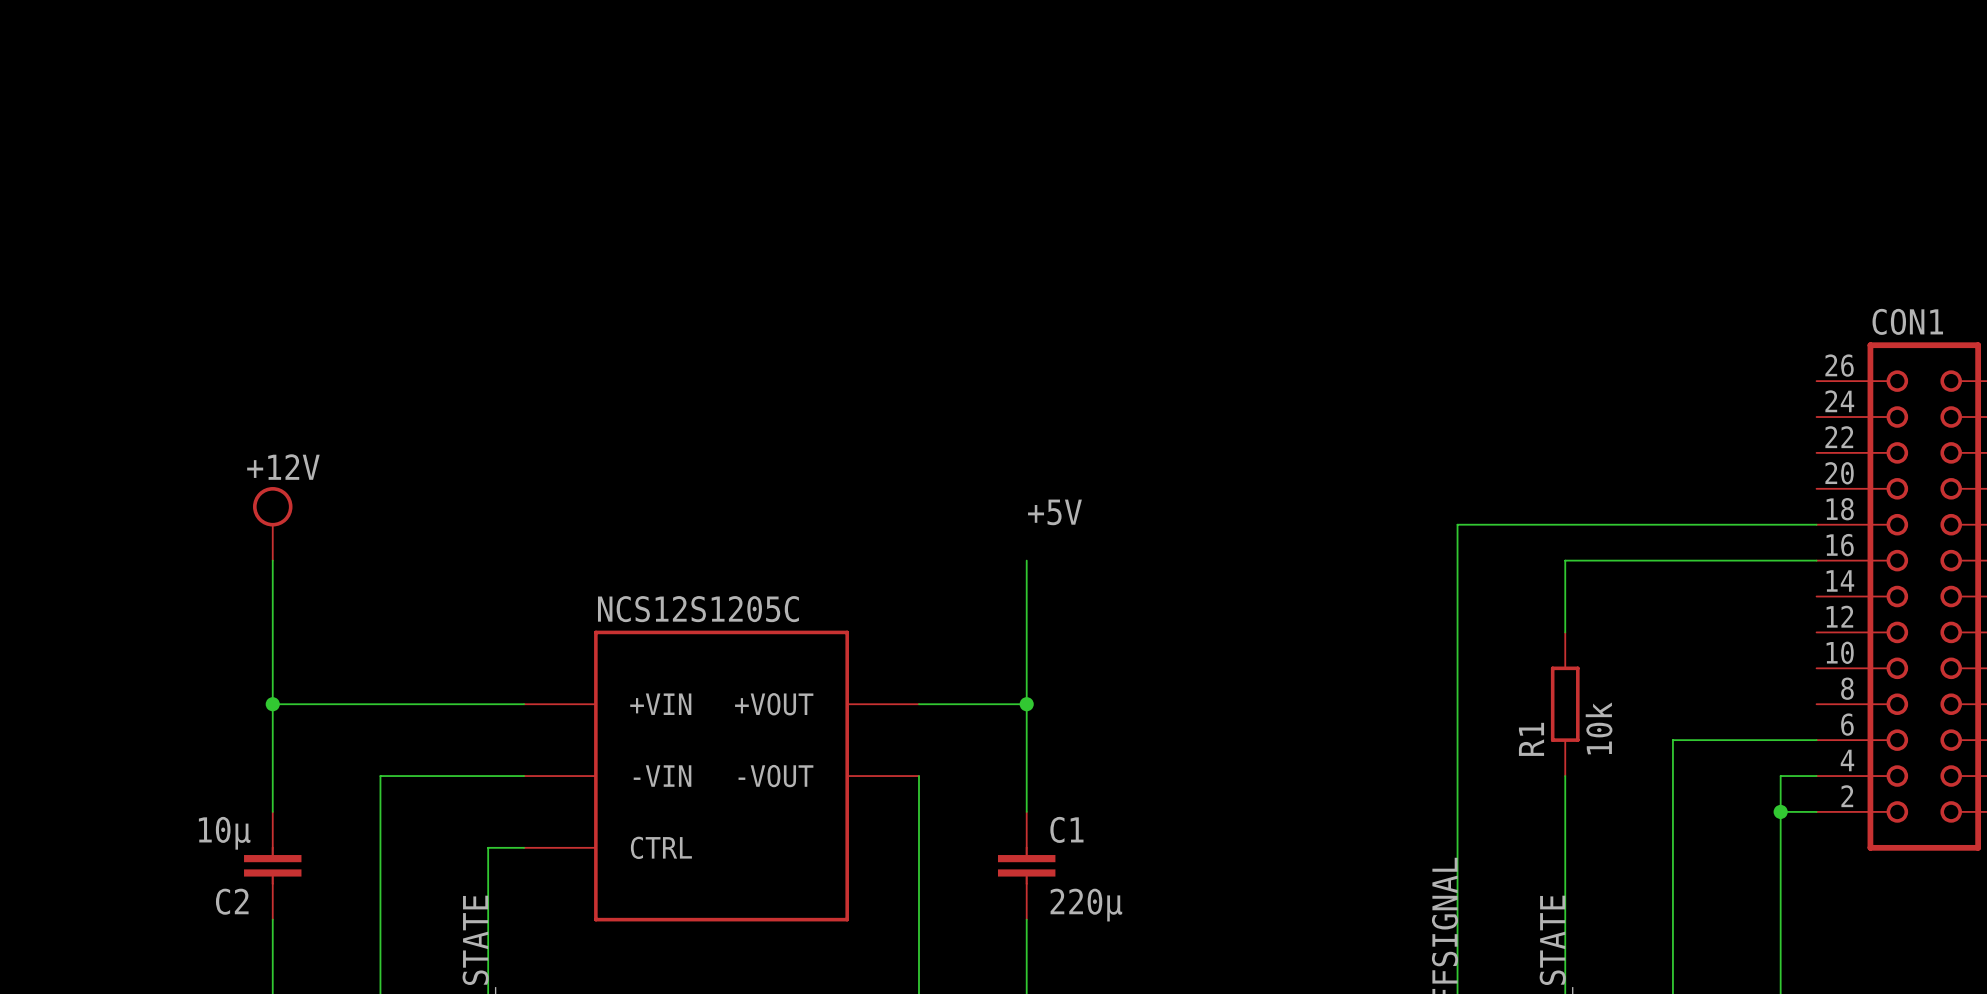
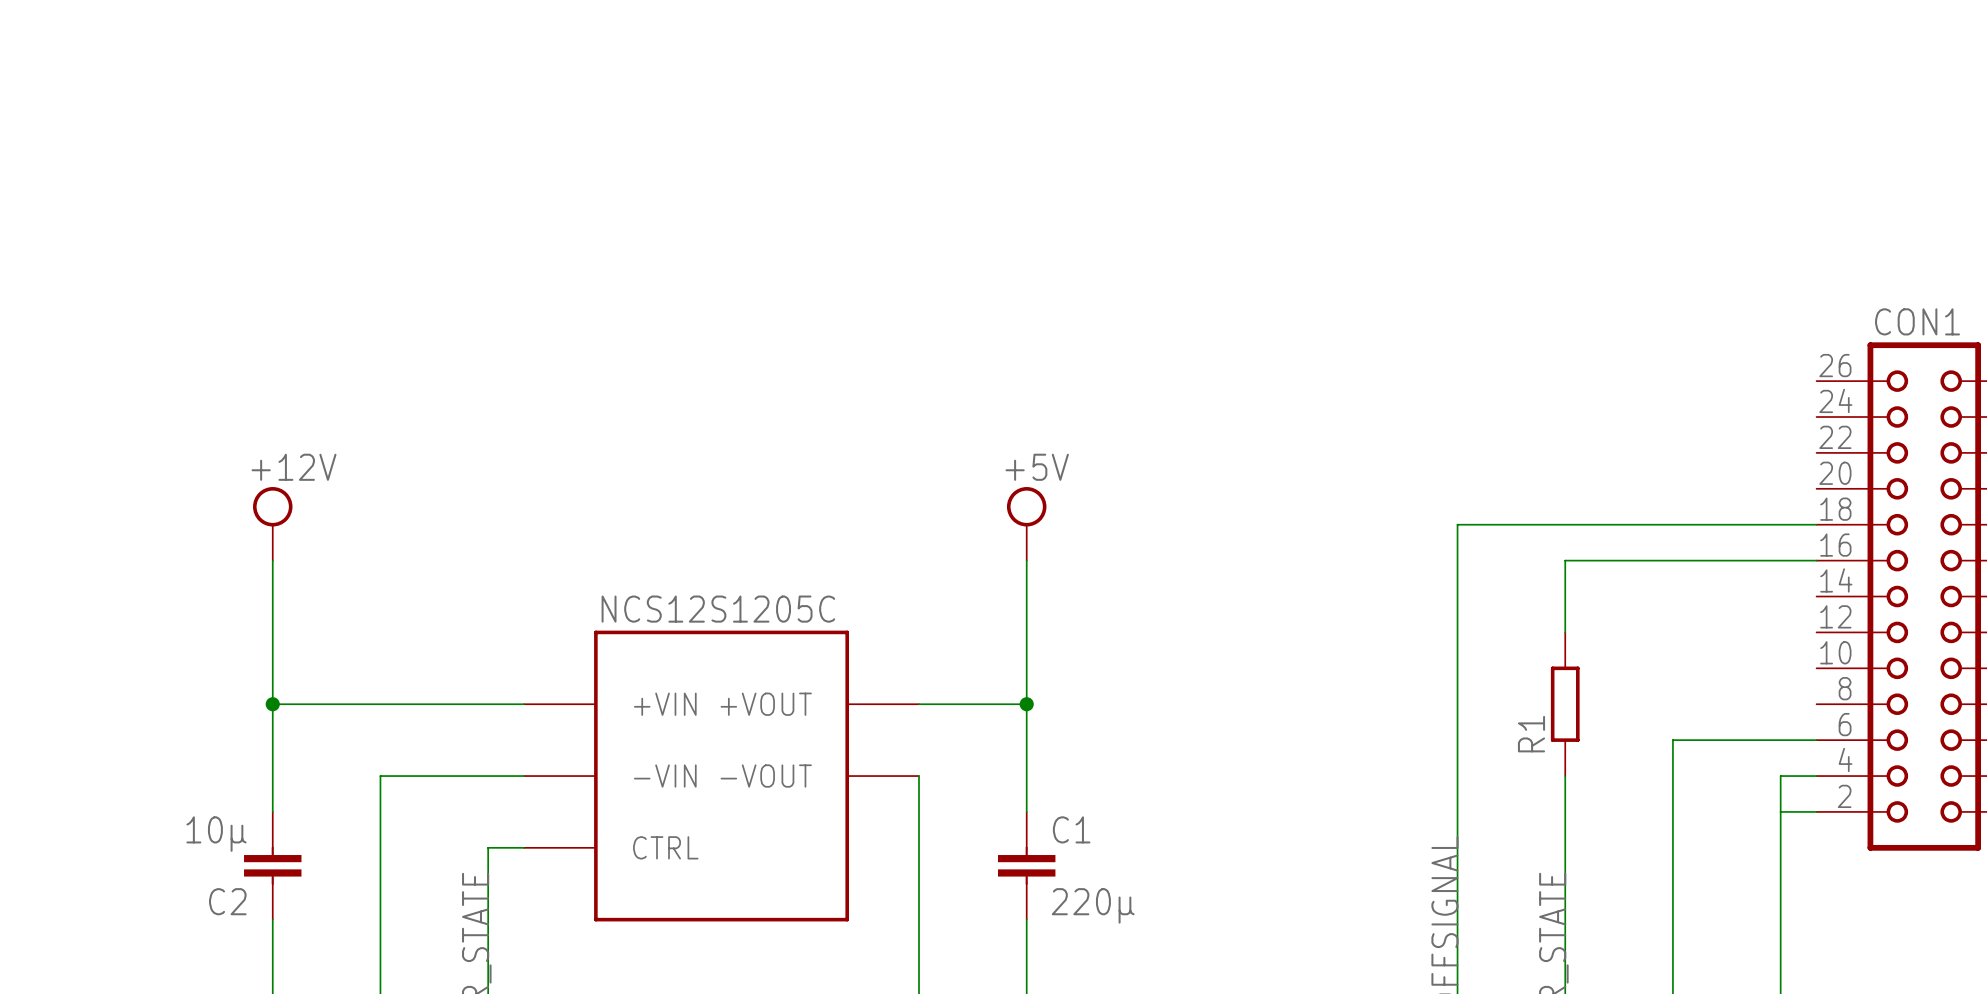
label: +5V (1054, 512) -> none
power symbol: none -> +5V (1026, 523)
R1 value: 10k (1599, 728) -> none
junction: (1780, 811) -> none

